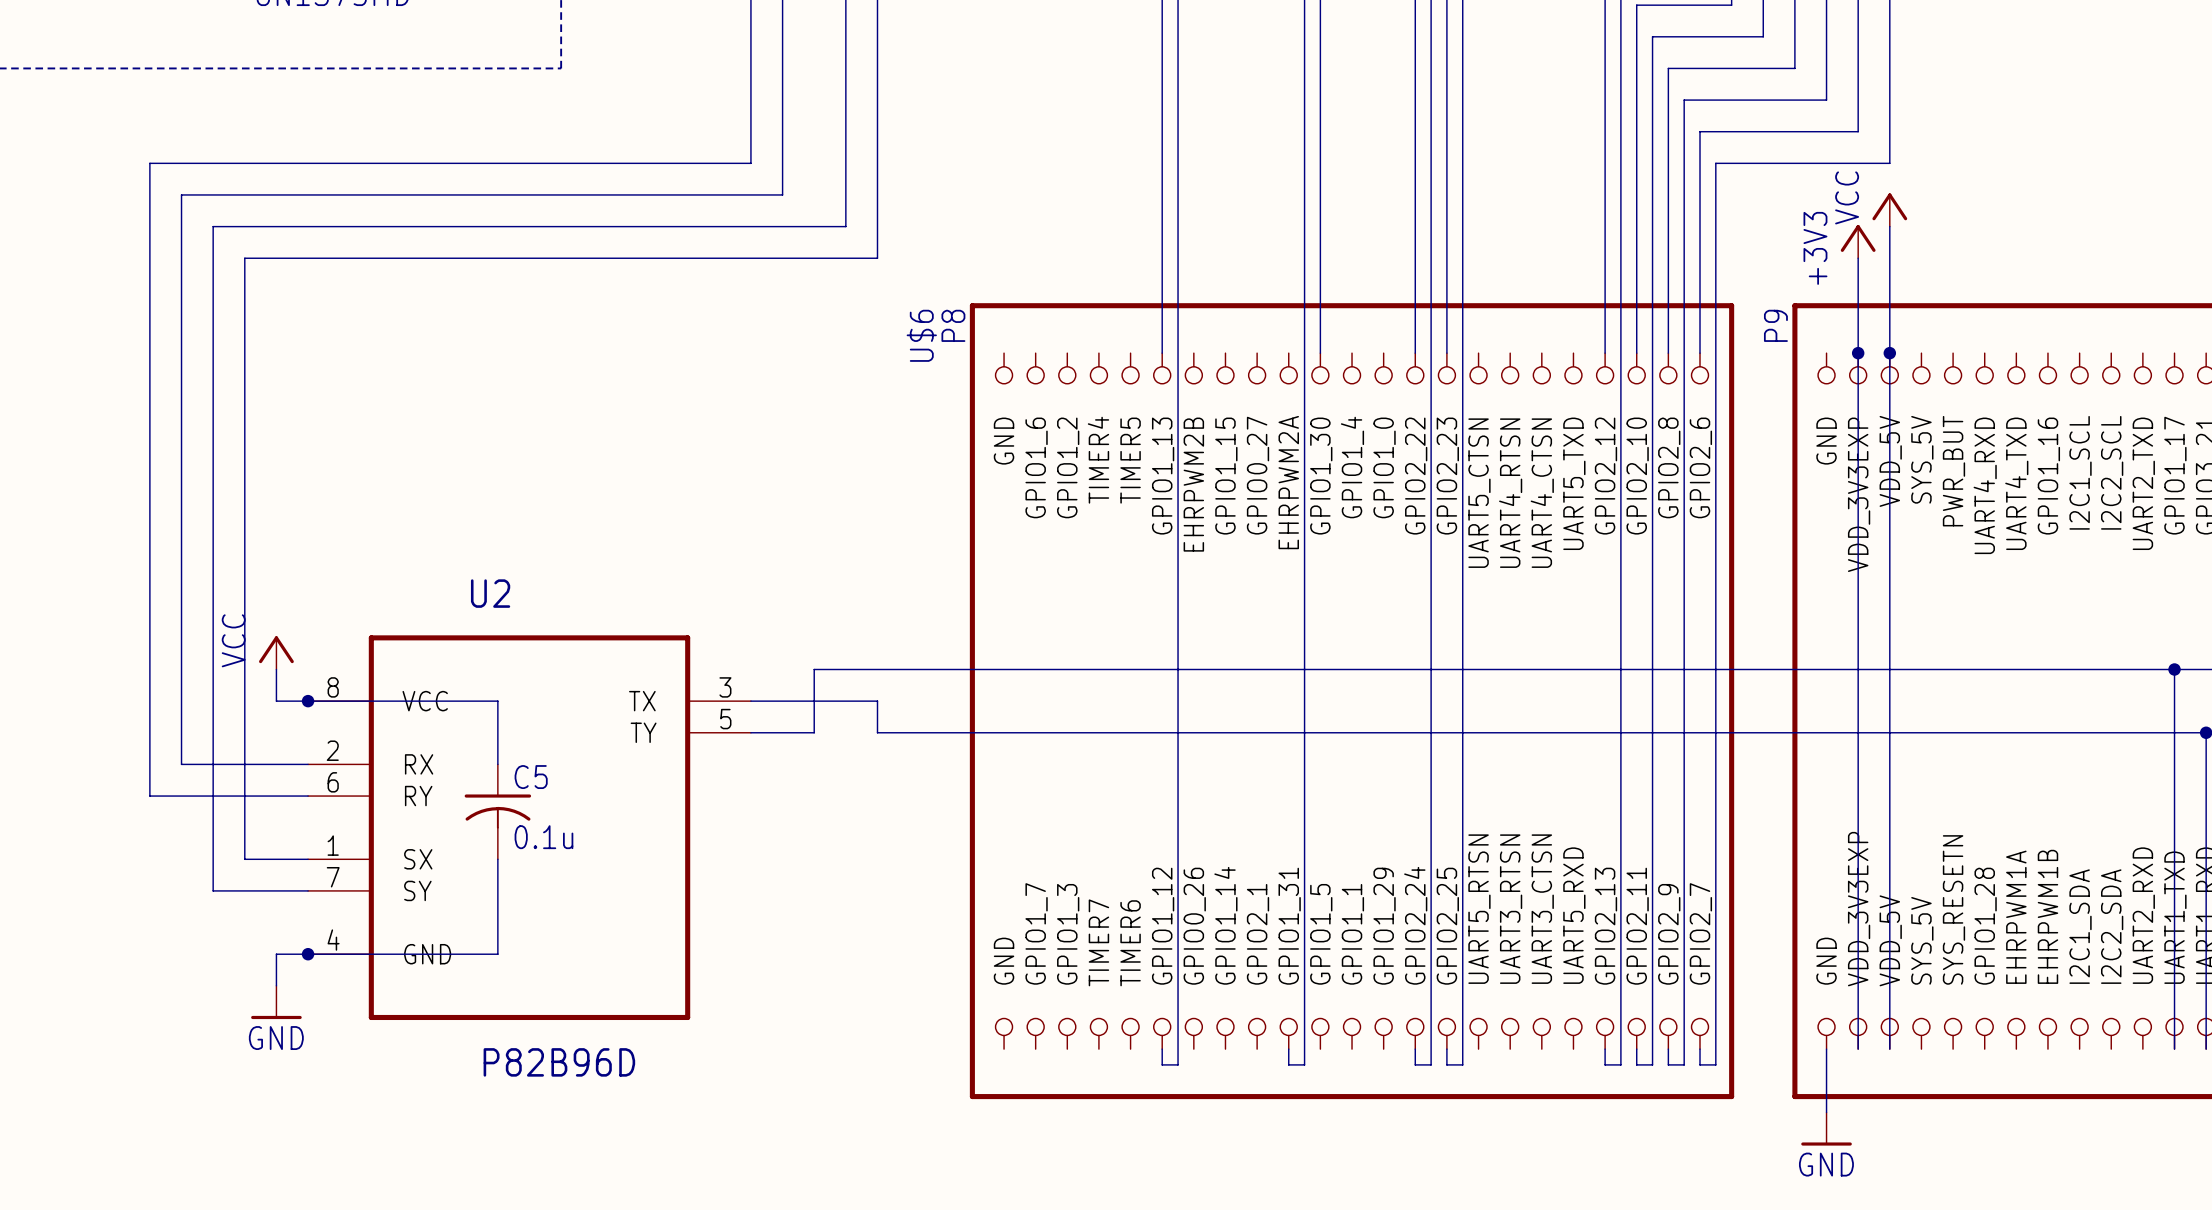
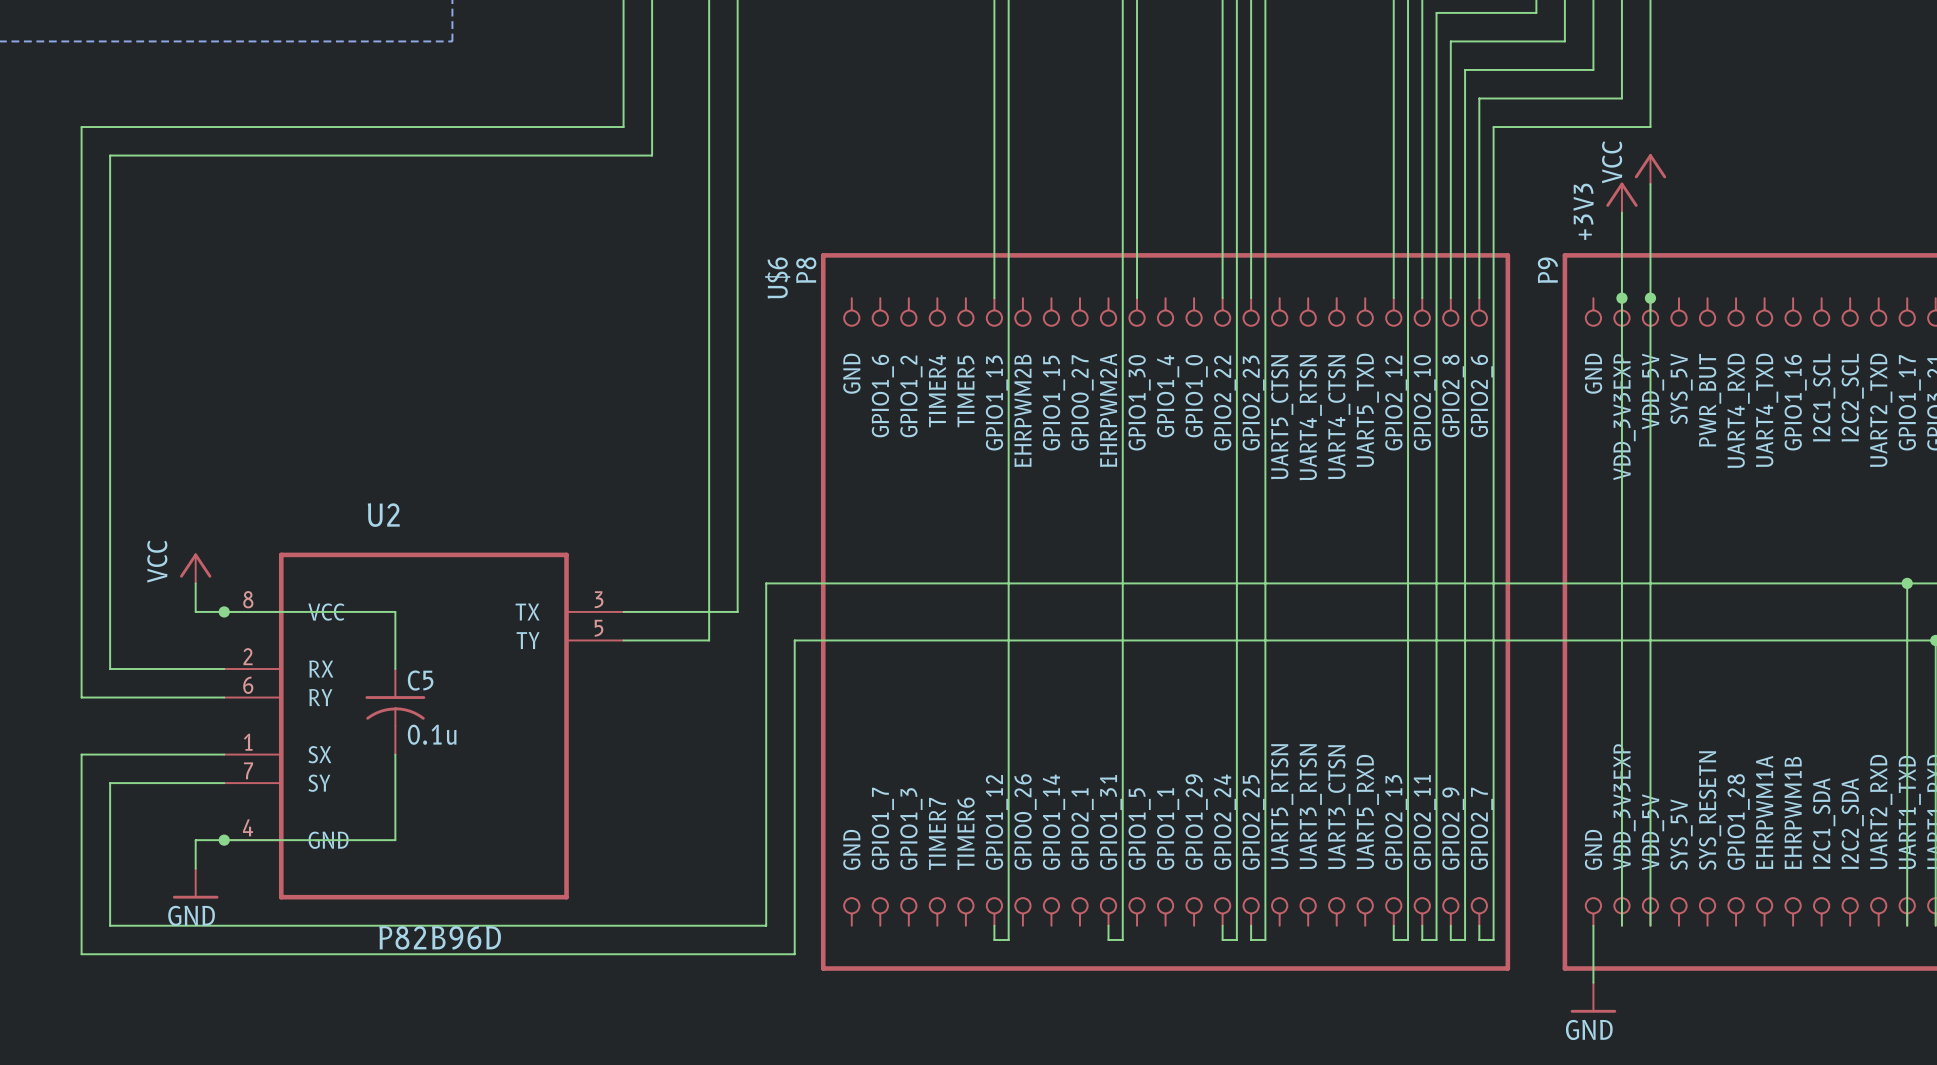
wire: (845, 226) (213, 226) (213, 890) -> (766, 583) (766, 925) (110, 925) (110, 783) (138, 783)
wire: (877, 258) (244, 258) (244, 859) -> (794, 640) (794, 954) (81, 954) (81, 754) (167, 754)
wire: (909, 669) (814, 669) (814, 732) -> (709, 184) (709, 640) (680, 640)
wire: (877, 701) (877, 732) (940, 732) -> (737, 611) (737, 212)

